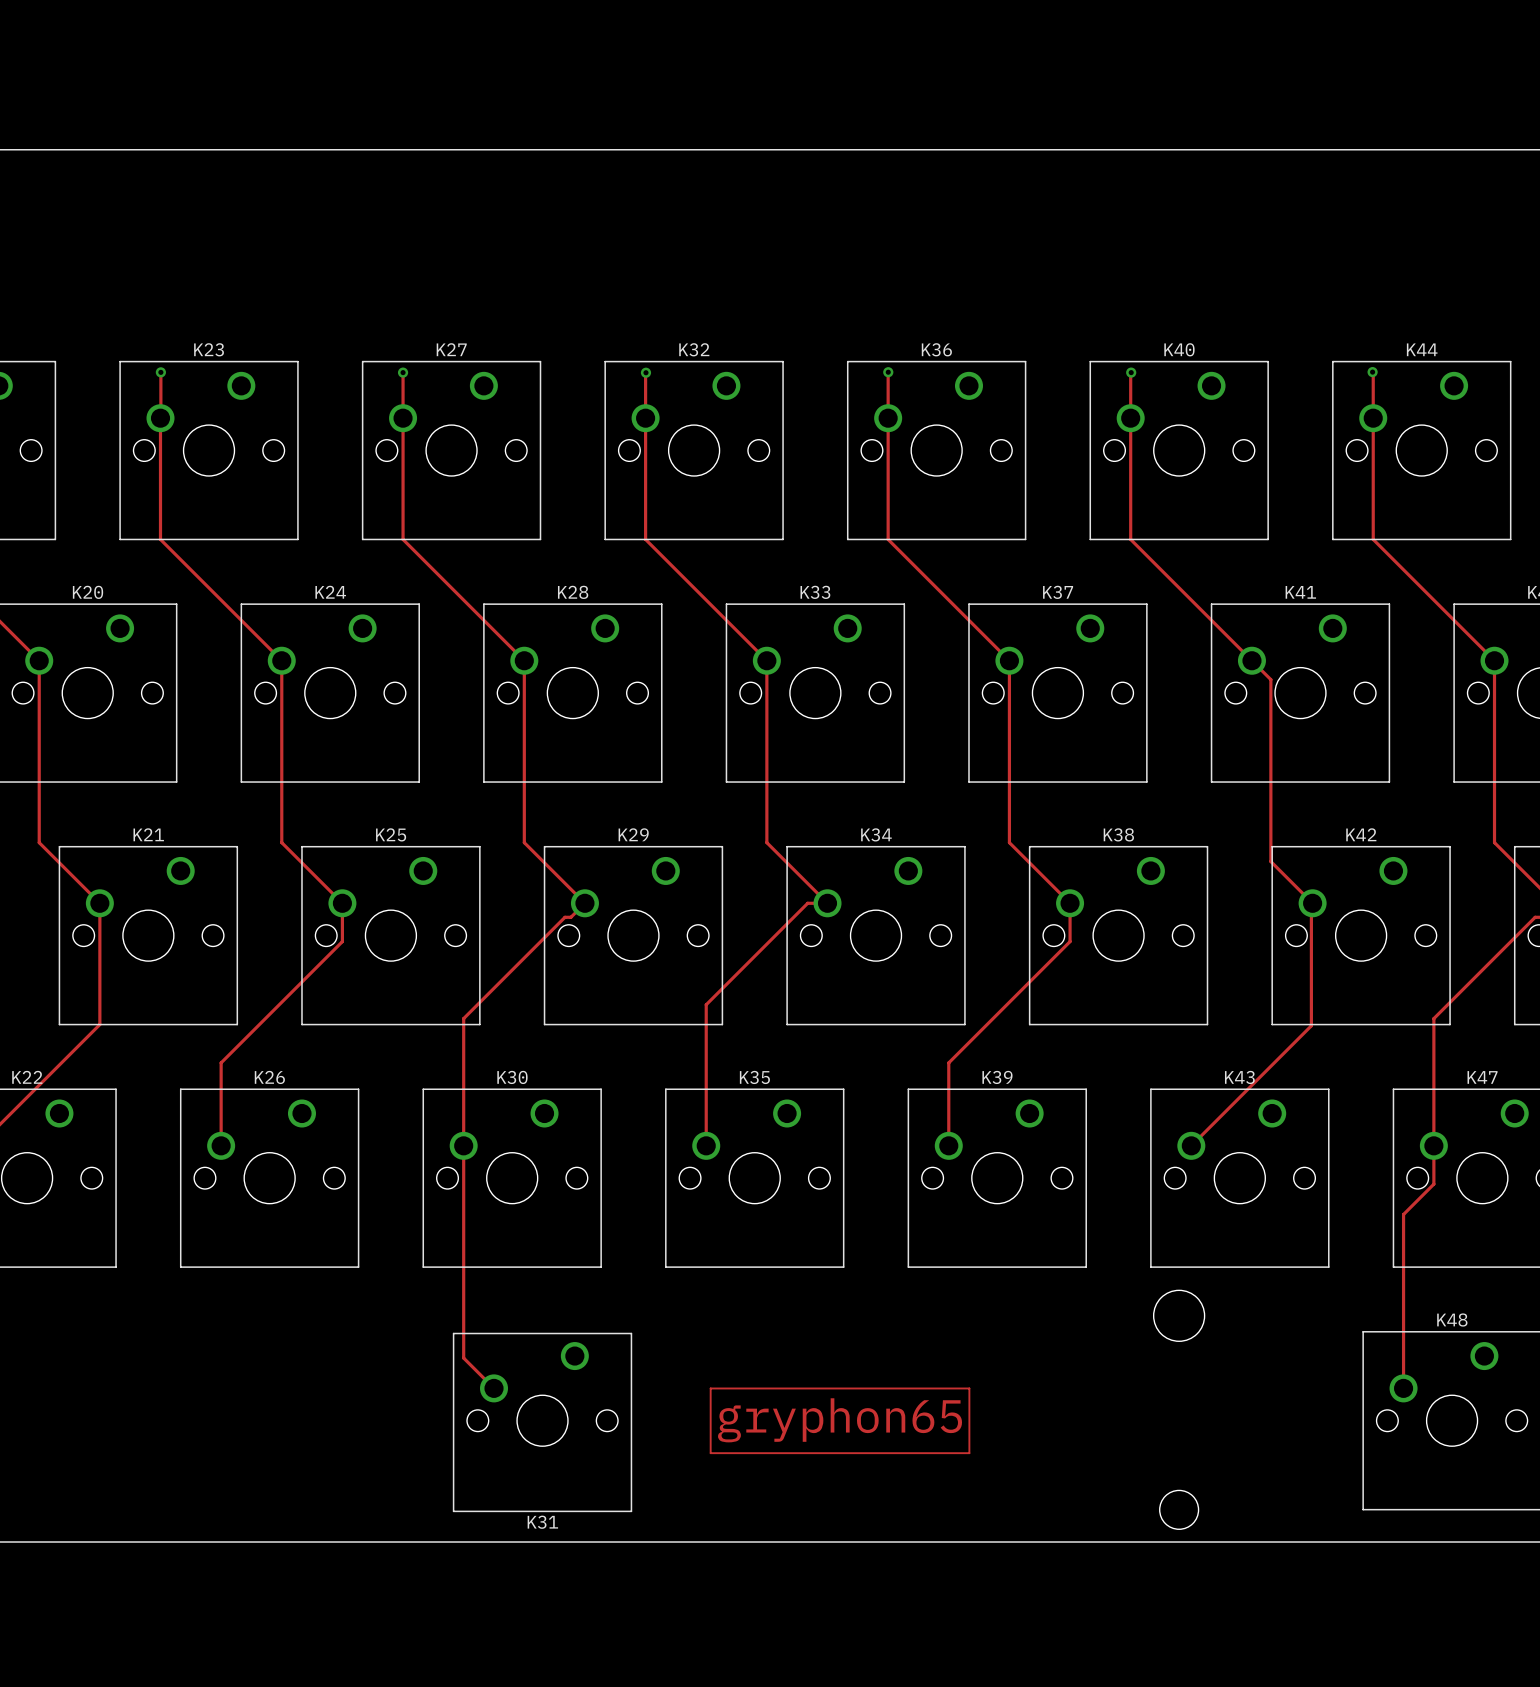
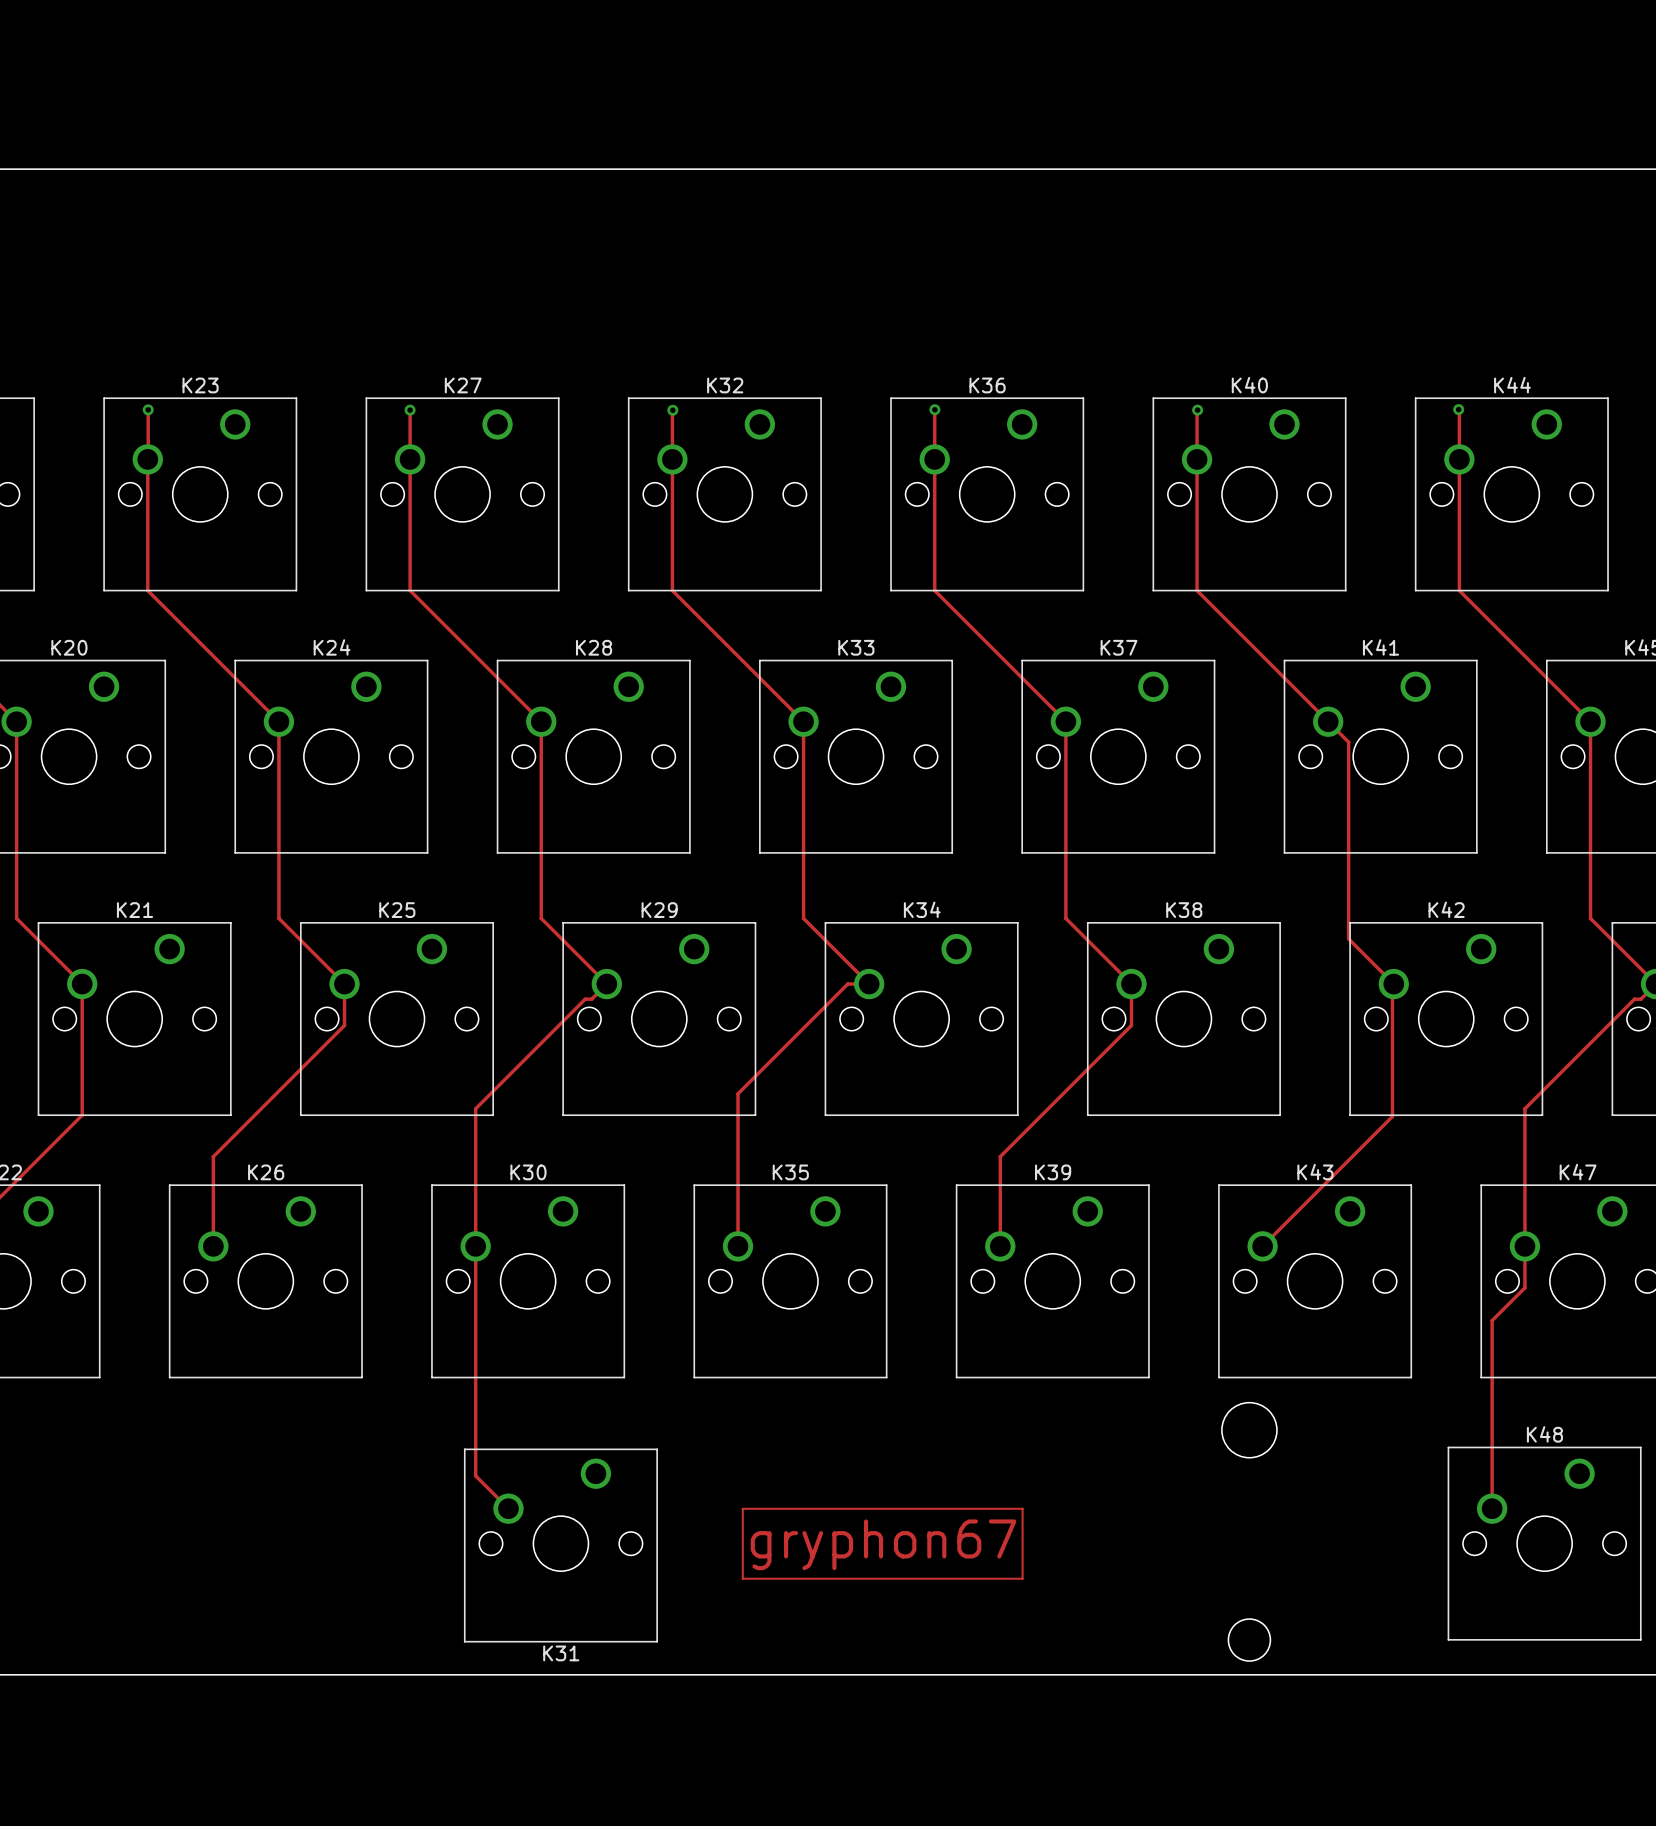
text: gryphon65 (840, 1420) -> gryphon67 (883, 1544)

